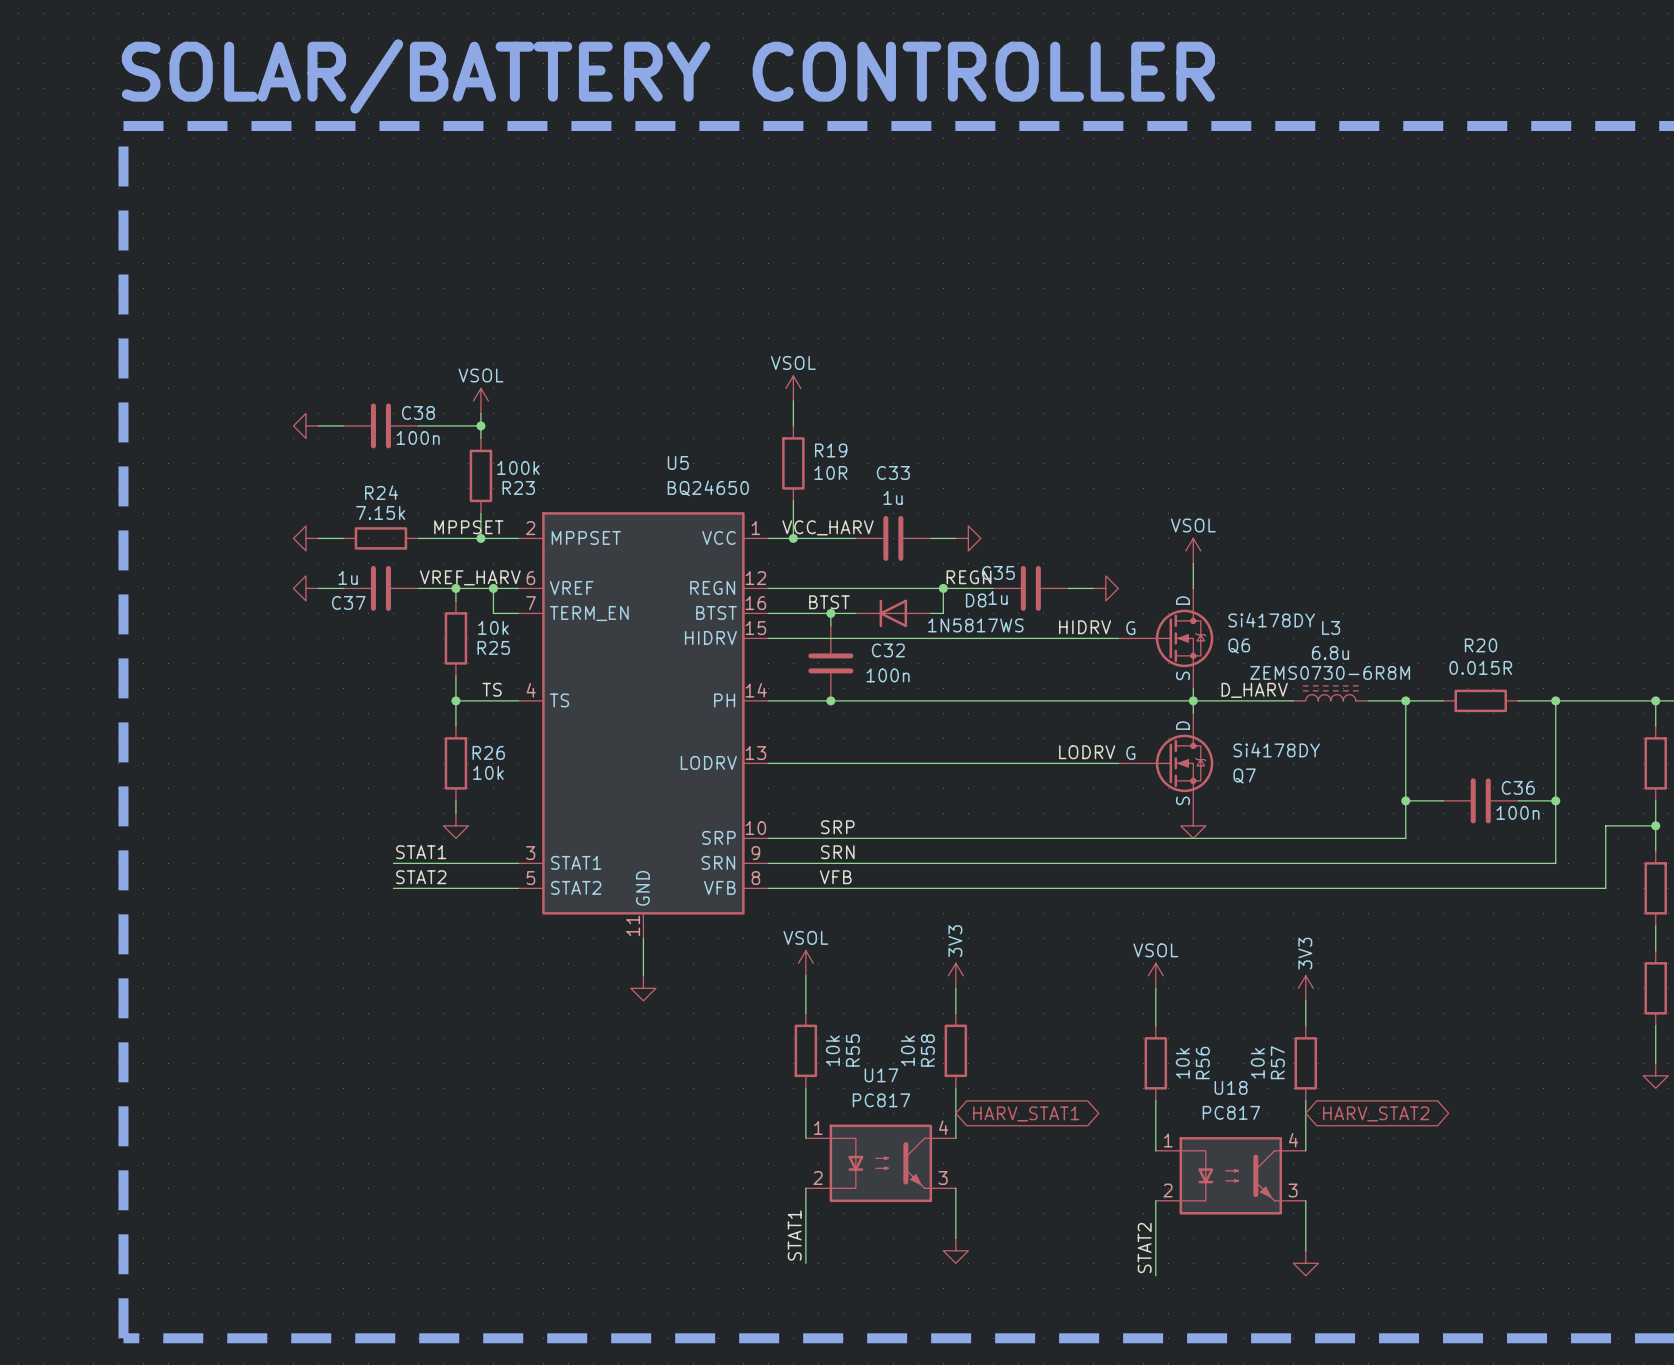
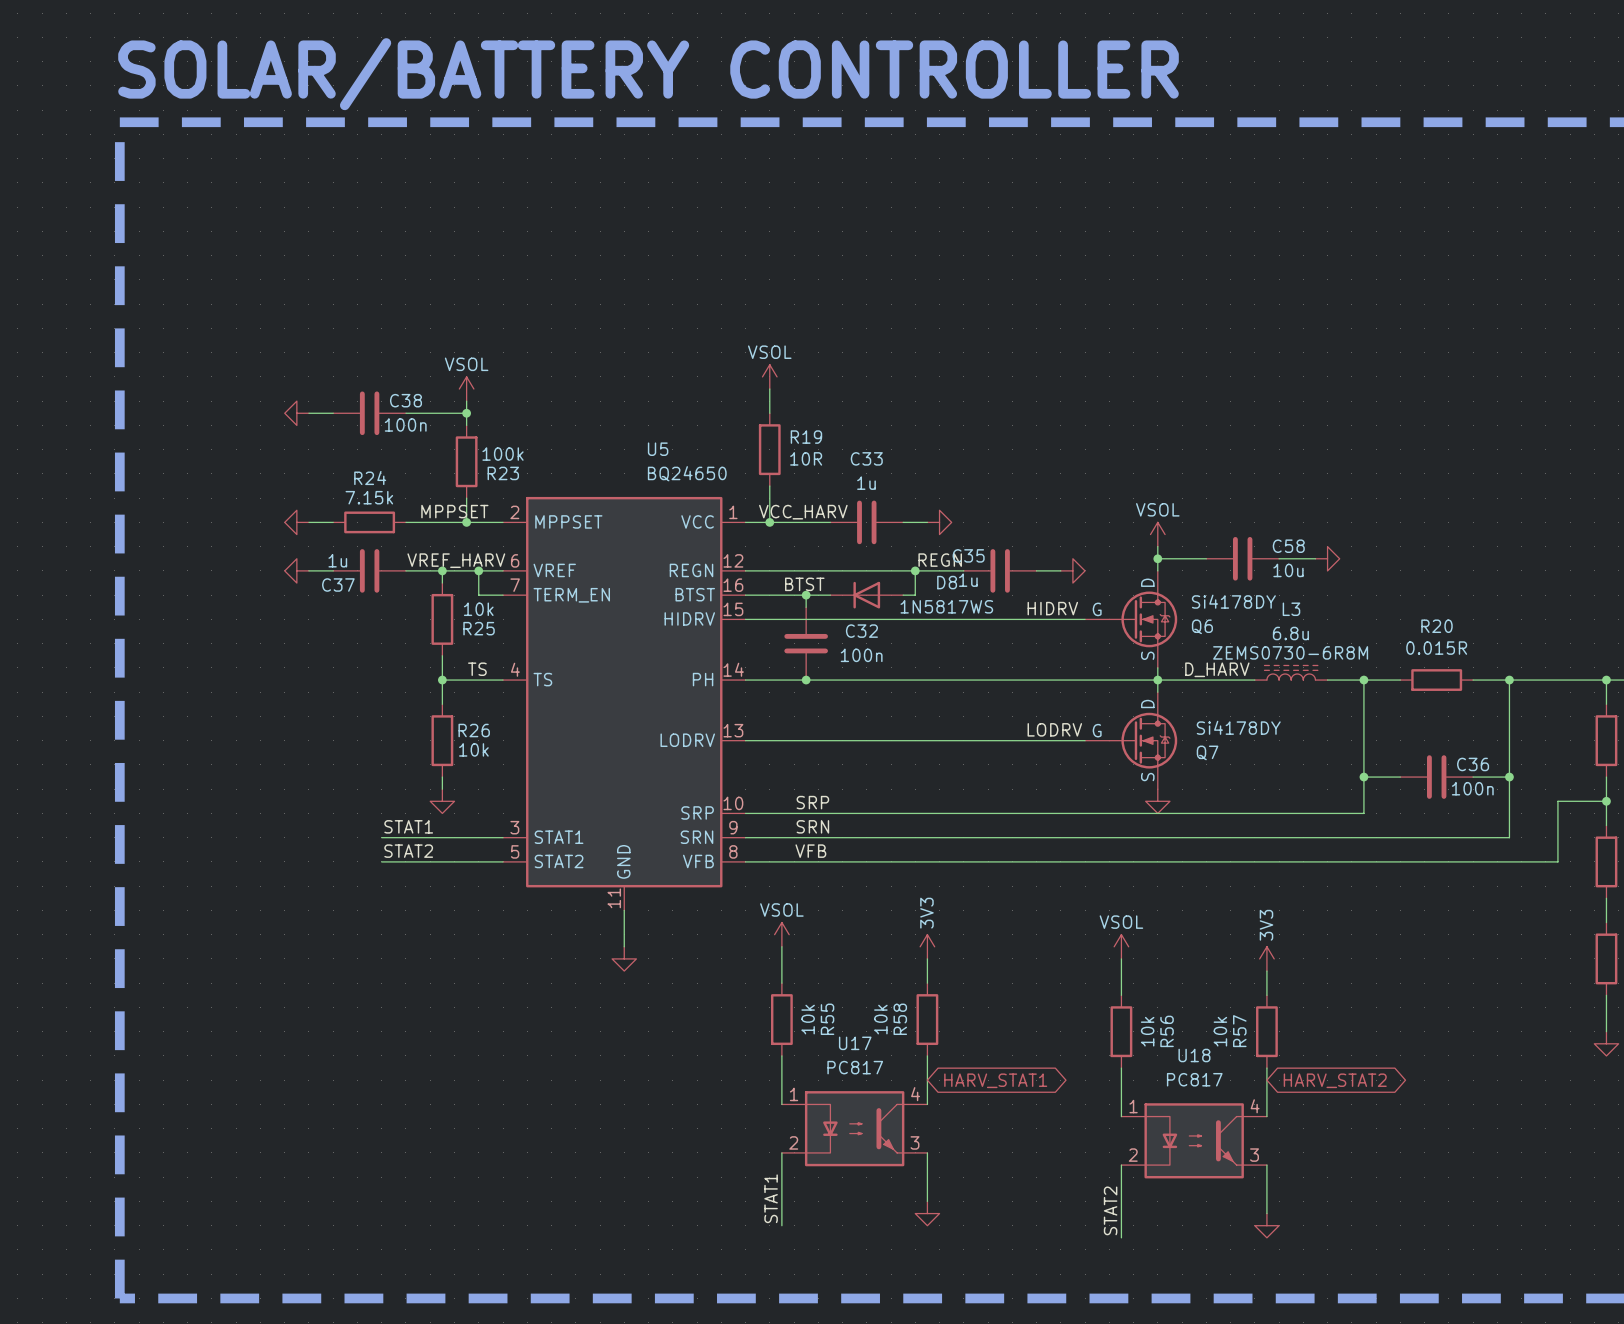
wire: none -> (1157, 558) (1206, 558)
junction: none -> (1157, 558)
C58: none -> 10u (1242, 558)
wire: none -> (1279, 558) (1315, 558)
power symbol: none -> (1327, 558)

